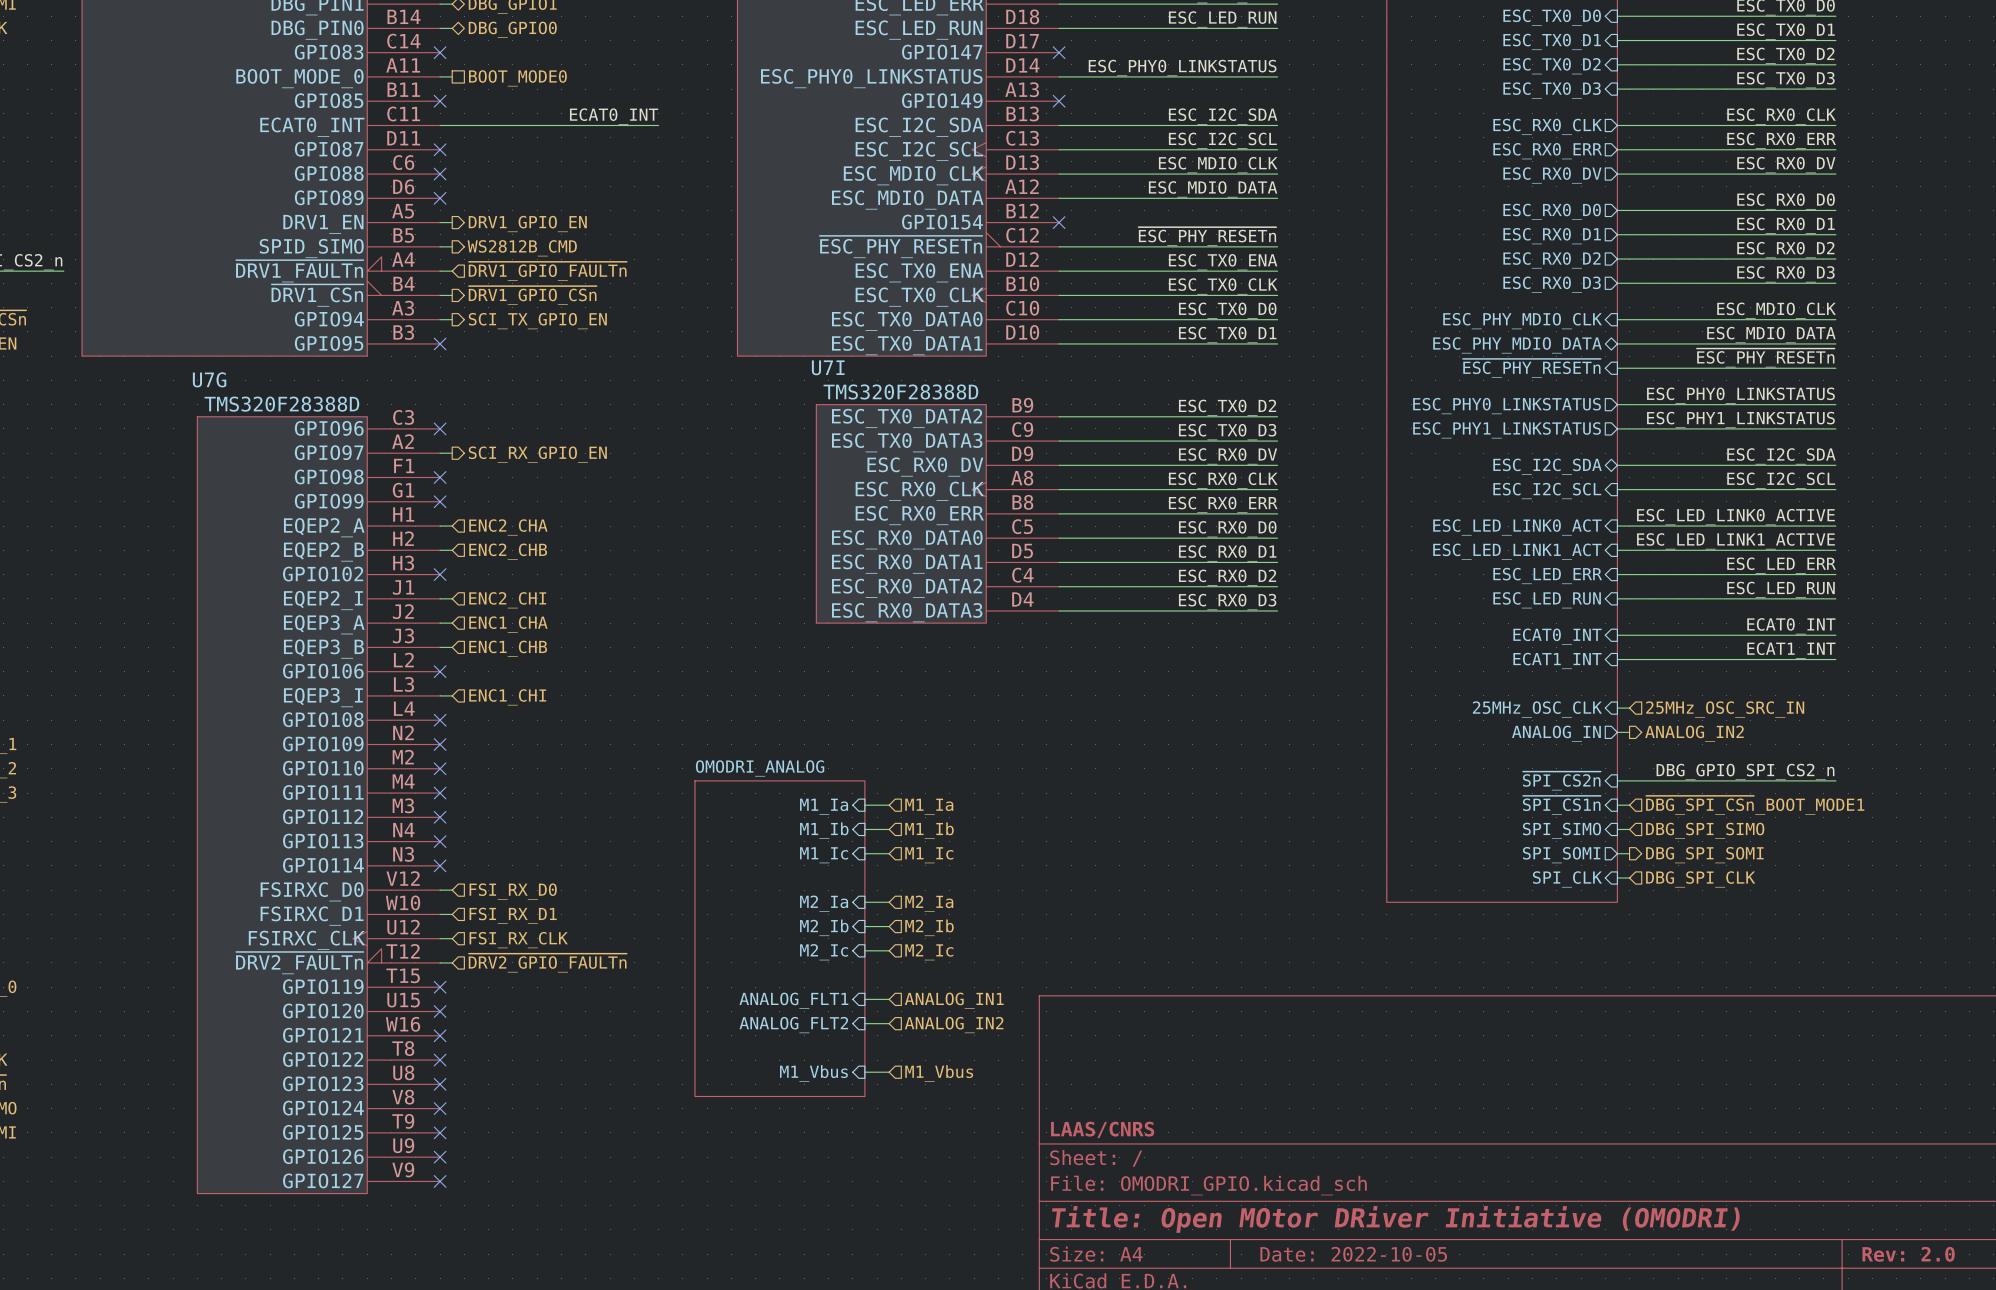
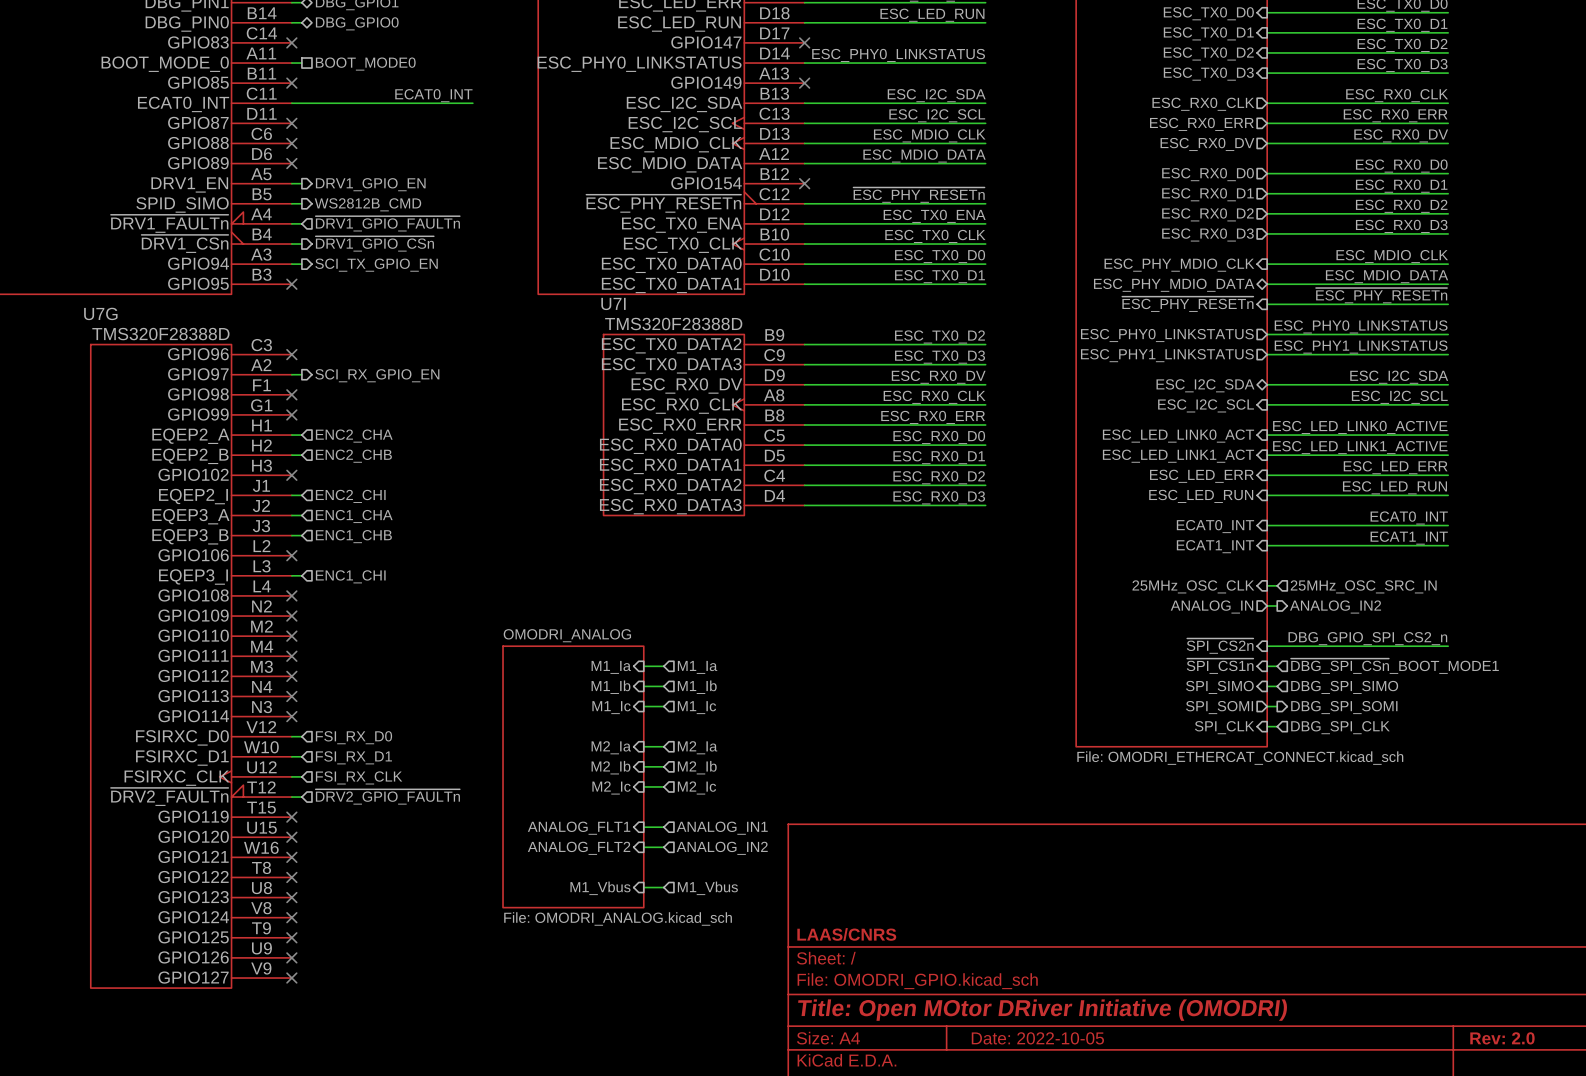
sheet value: none -> File: OMODRI_ETHERCAT_CONNECT.kicad_sch (1240, 758)
sheet OMODRI_ANALOG value: none -> File: OMODRI_ANALOG.kicad_sch (618, 918)

